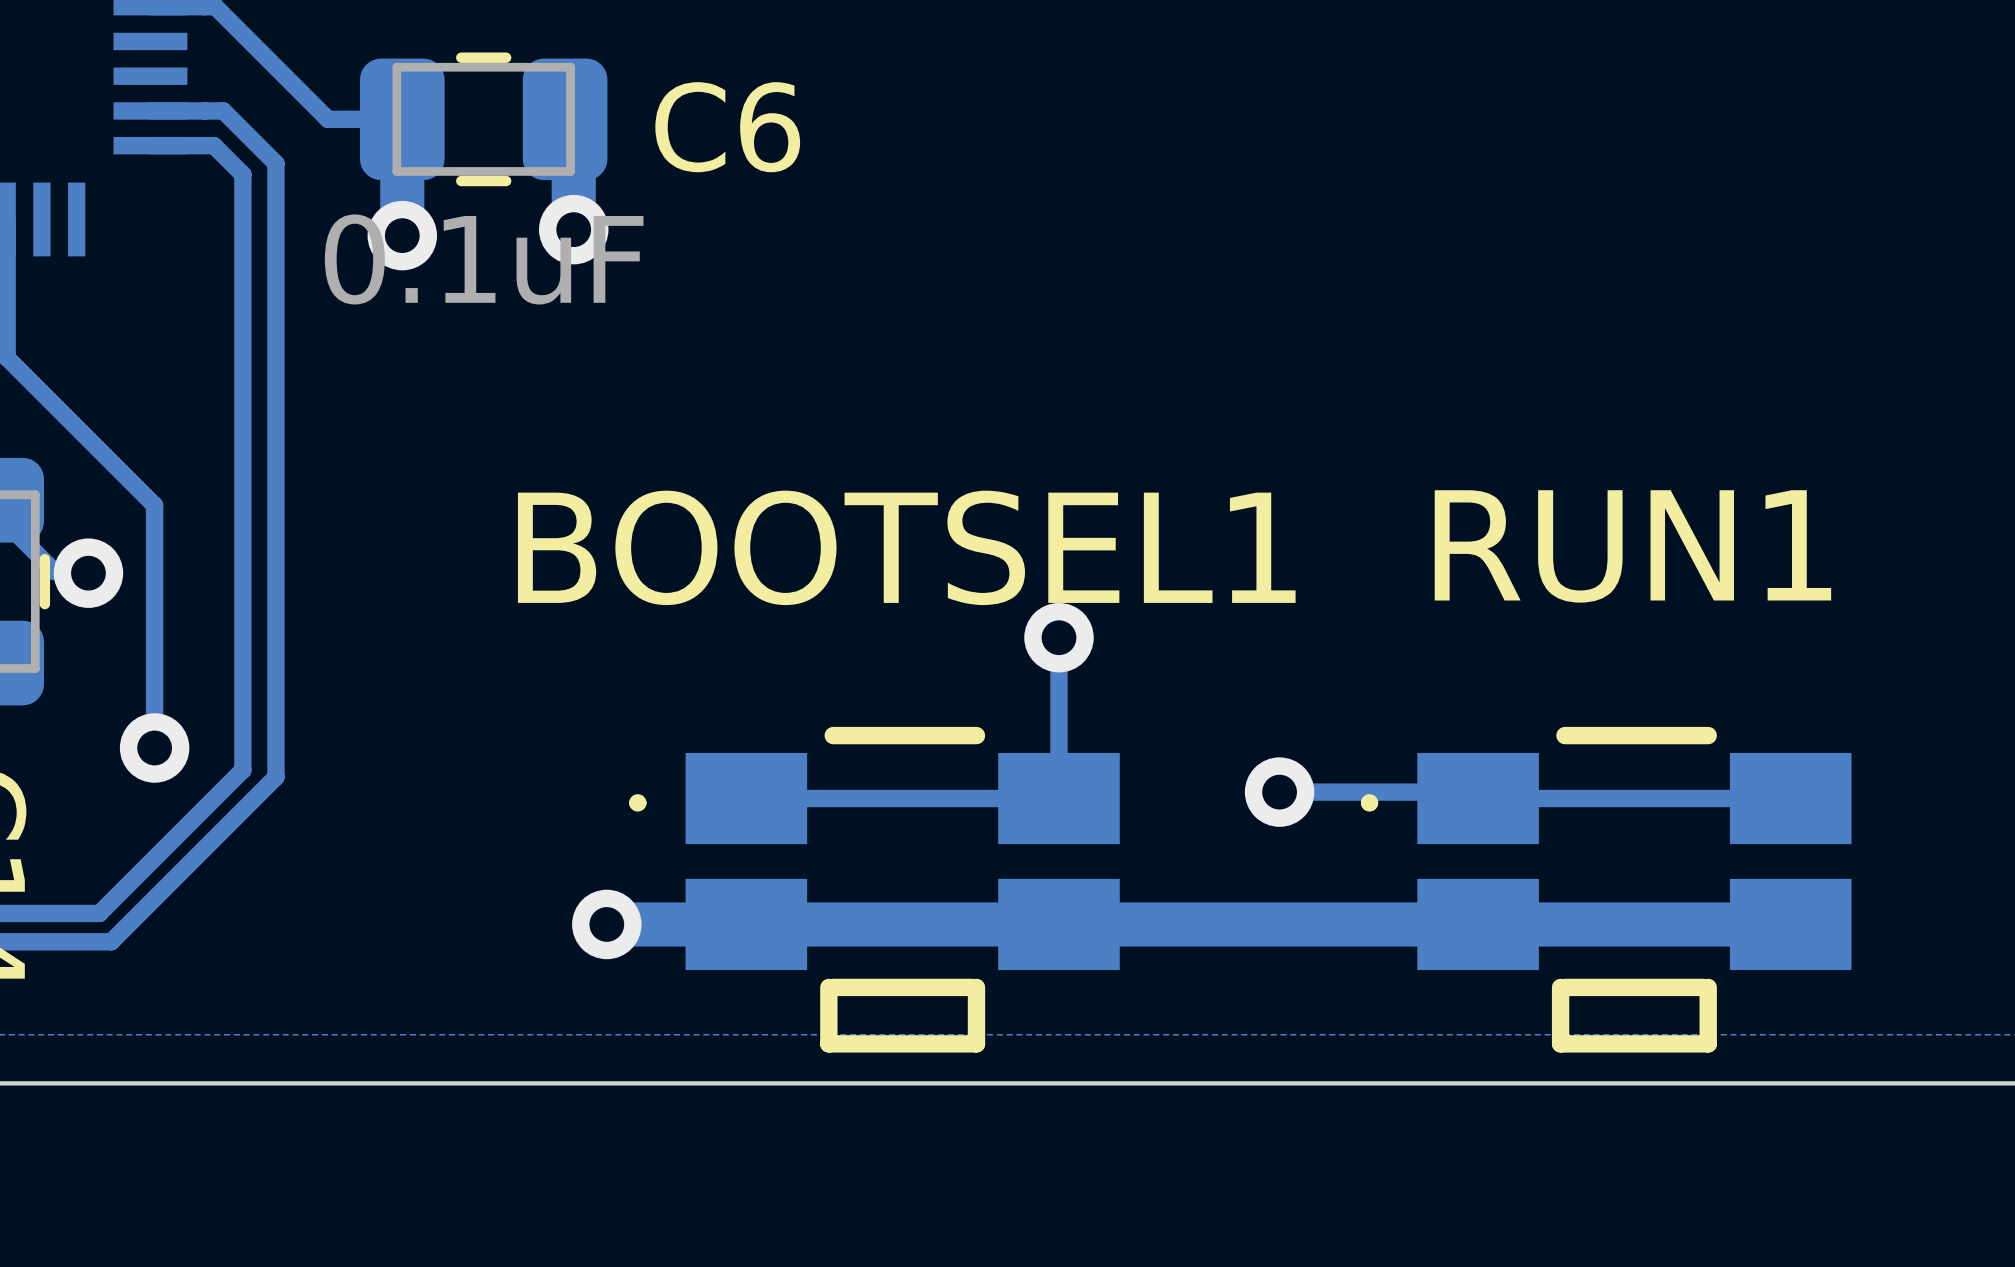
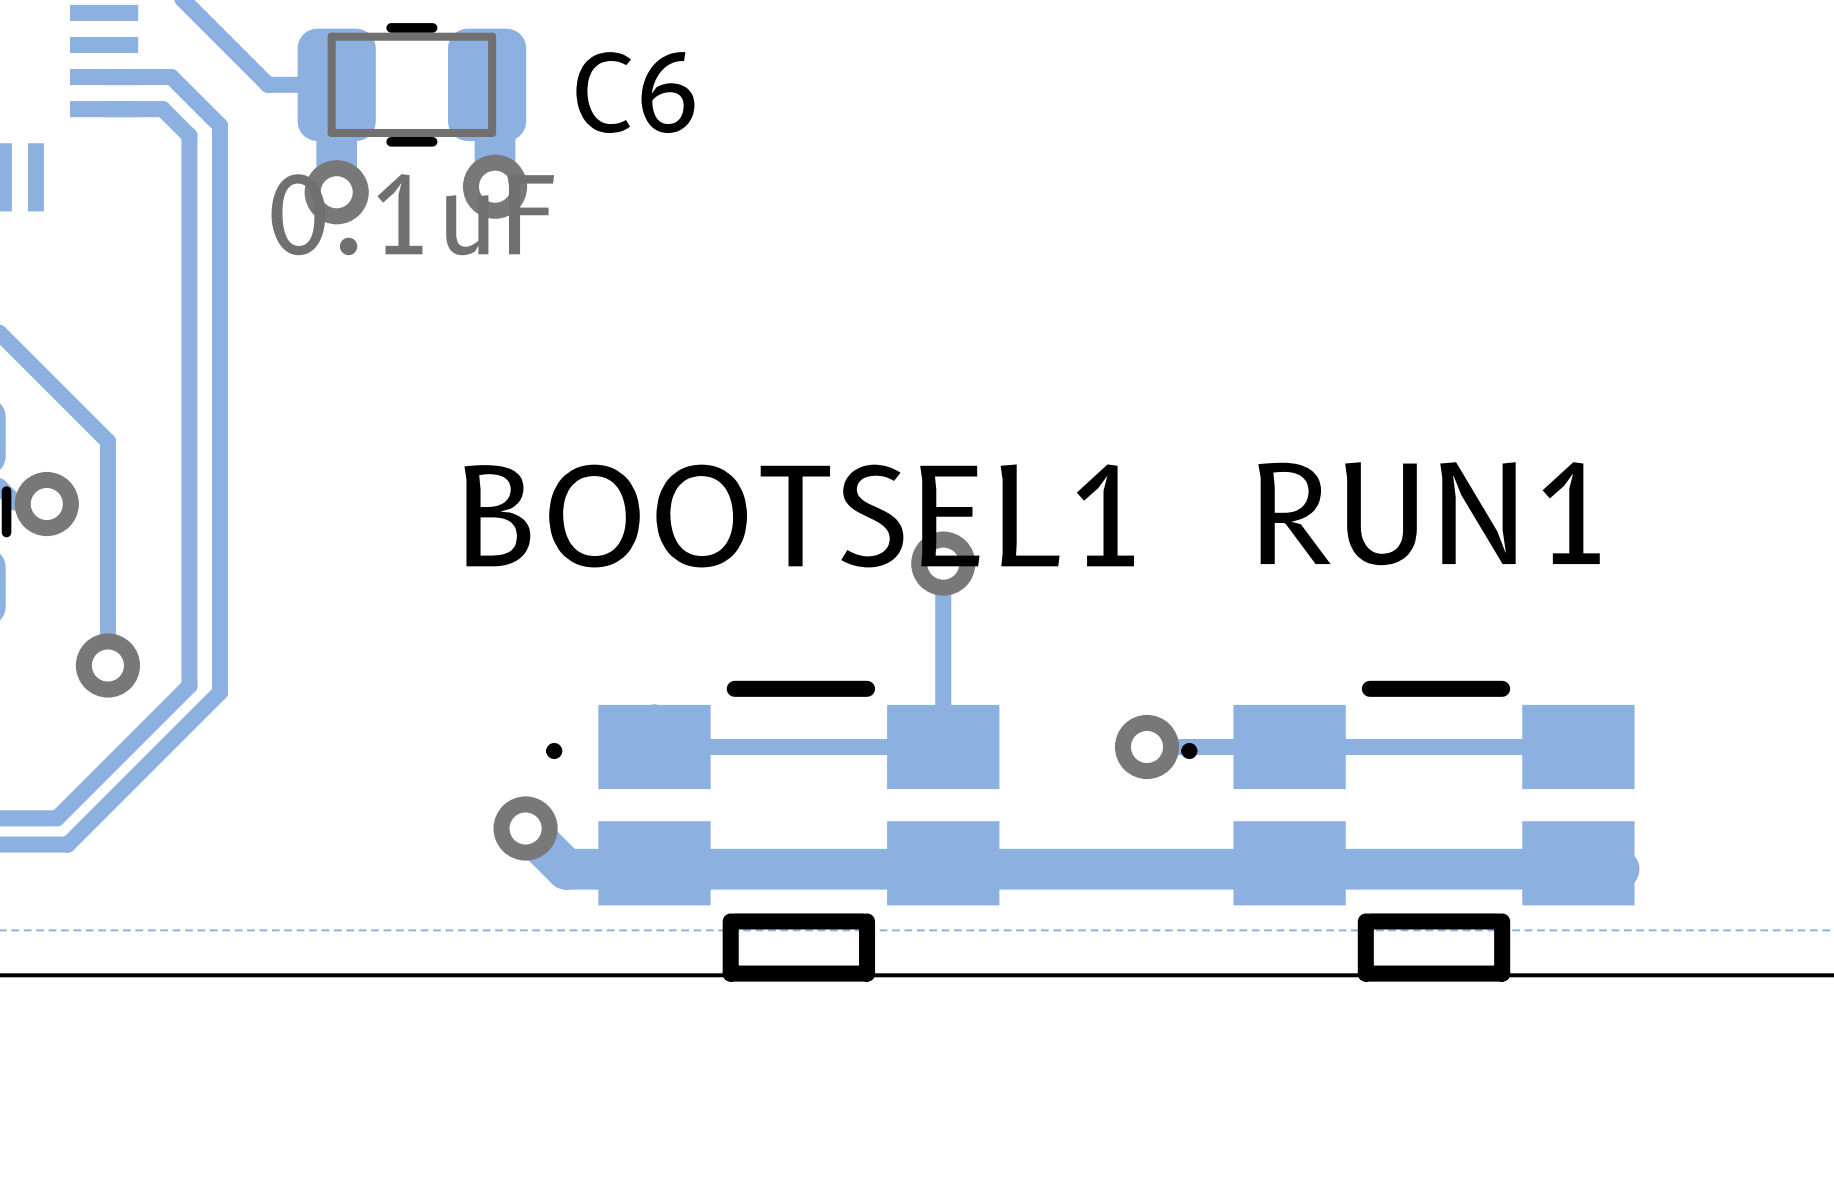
track: (1279, 792) (1471, 792) (1478, 798) (1790, 798) -> none
via position: (1279, 792) -> (1146, 746)
track: (1058, 798) (746, 798) -> (943, 712) (943, 746) (689, 746) (654, 712)
track: none -> (1595, 746) (1146, 746)
BOOTSEL1 position: (874, 889) -> (772, 831)
RUN1 position: (1606, 889) -> (1407, 831)
track: (1790, 924) (606, 924) -> (1619, 869) (566, 869) (525, 828)

